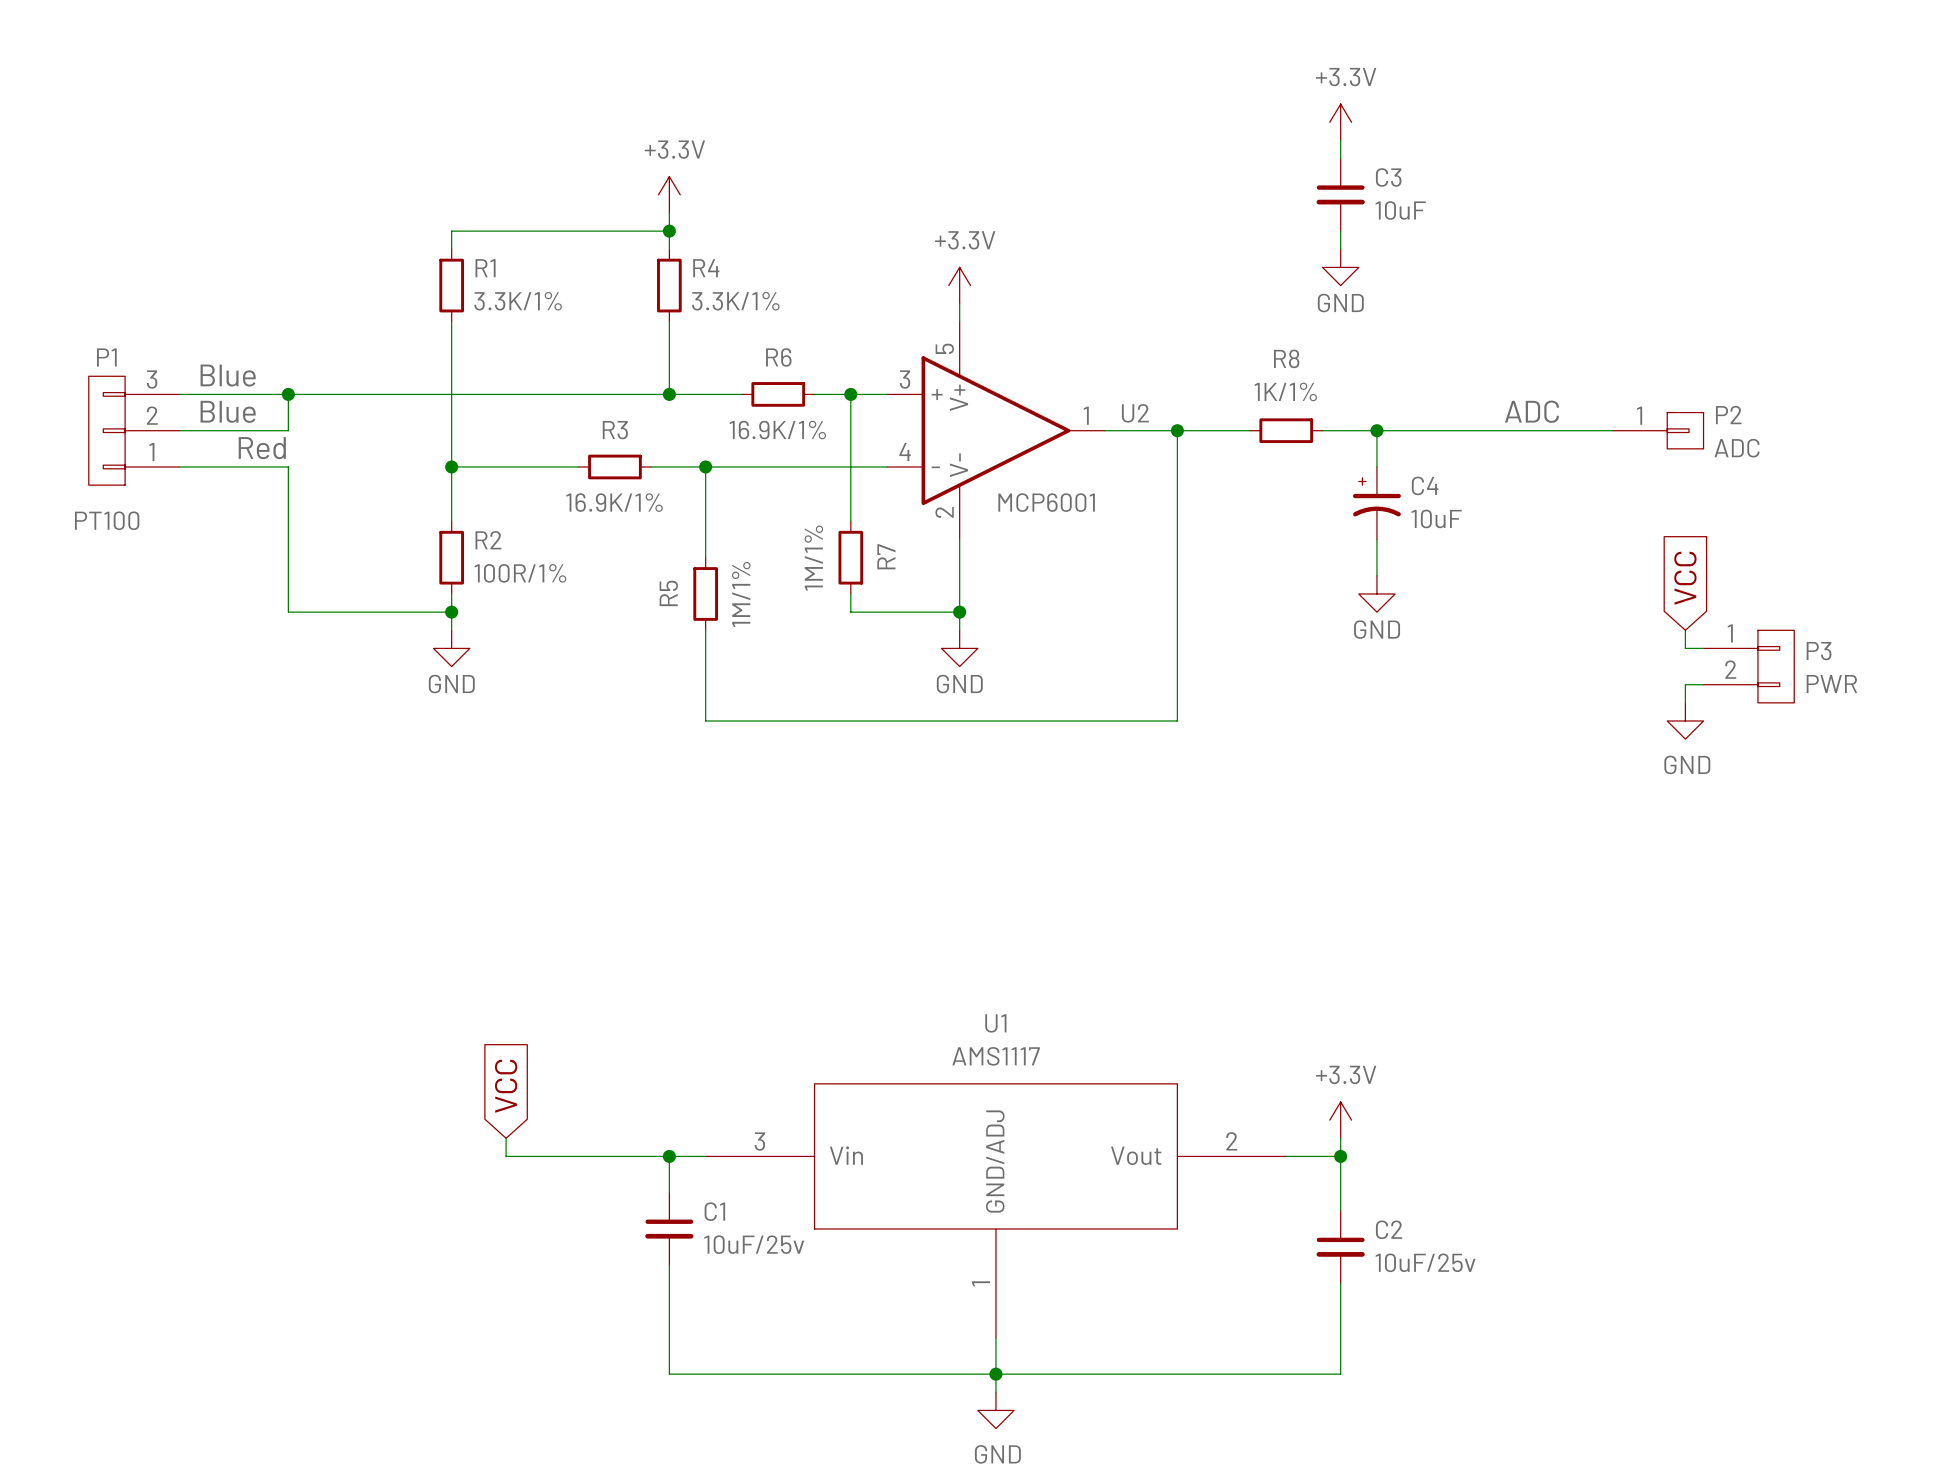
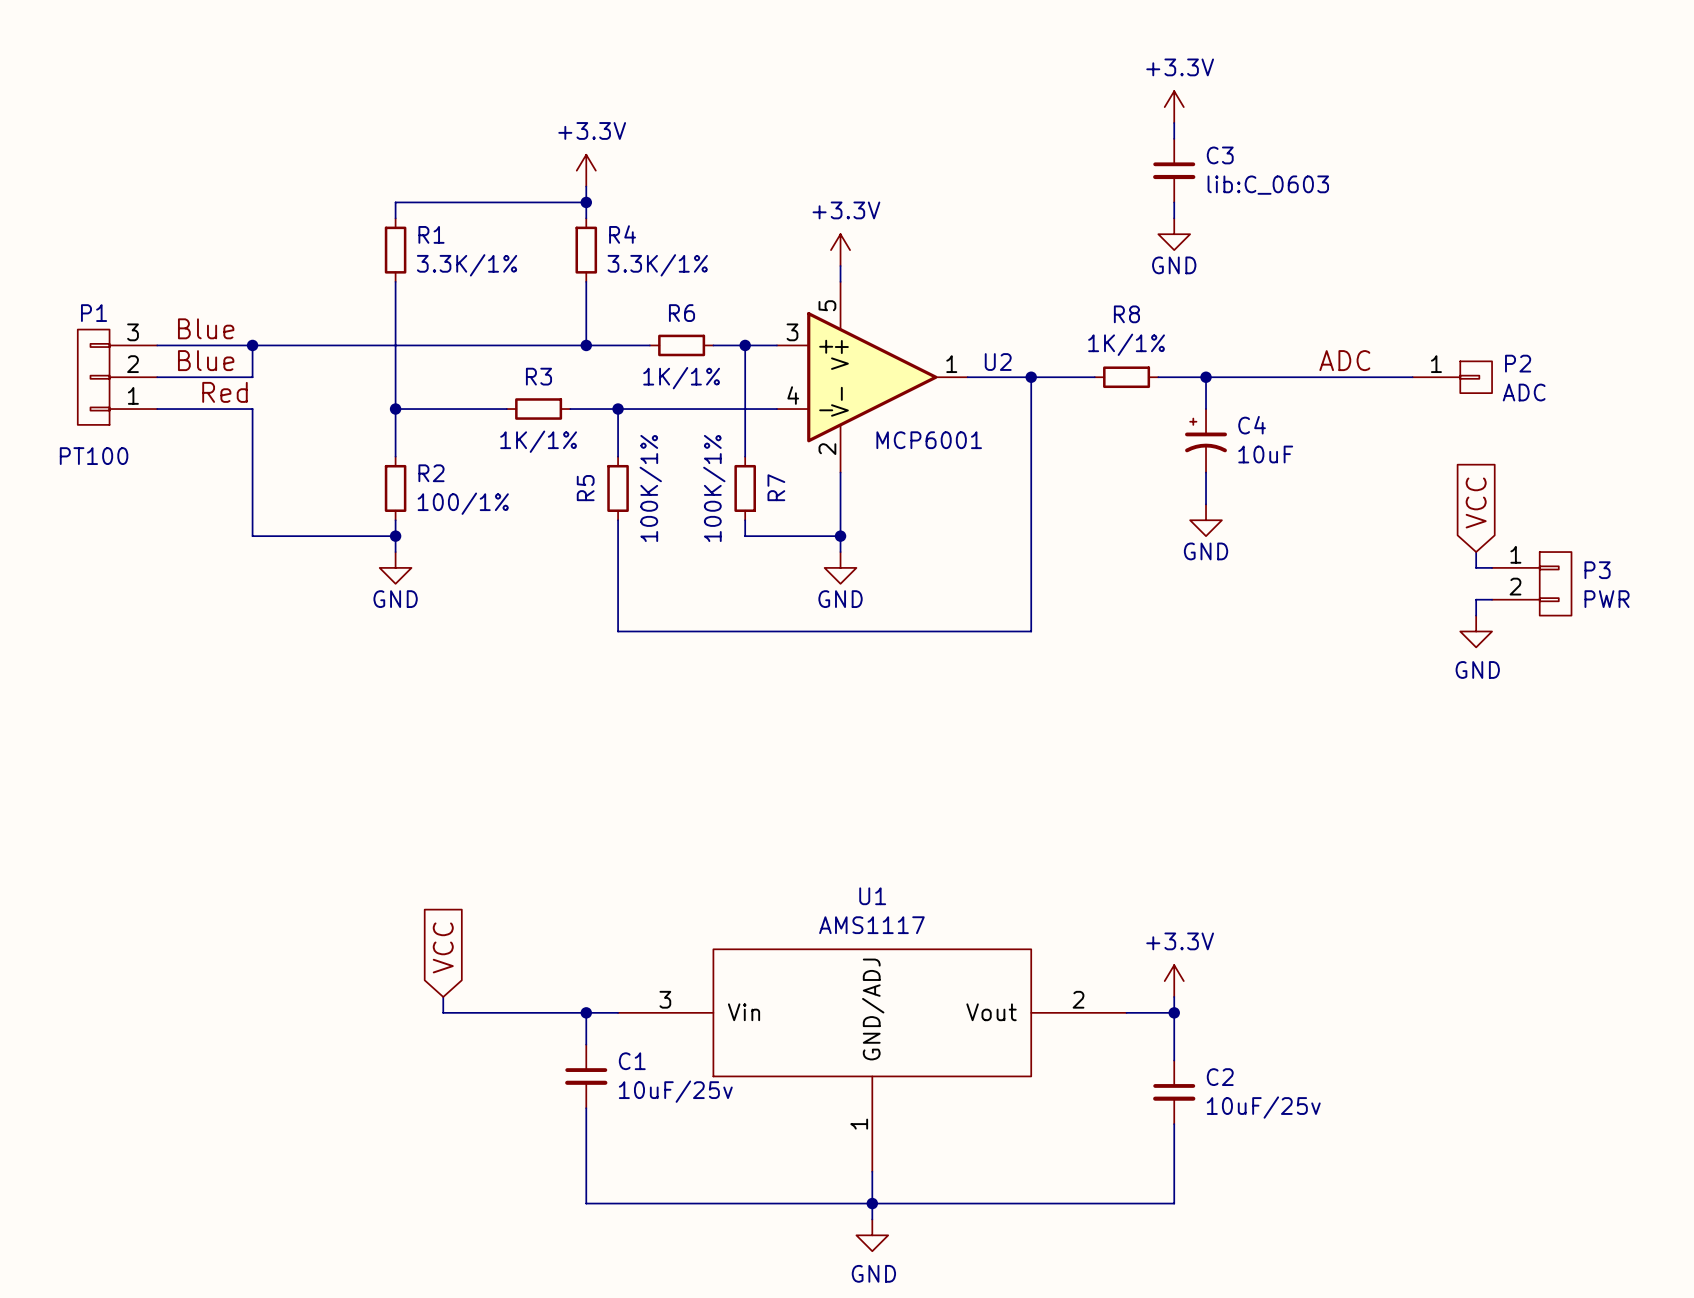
C3 value: 10uF (1400, 210) -> lib:C_0603 (1268, 185)
R6 value: 16.9K/1% (777, 430) -> 1K/1% (681, 378)
R3 value: 16.9K/1% (614, 502) -> 1K/1% (538, 441)
wire: (705, 521) (705, 557) -> (618, 520) (618, 552)
R7 value: 1M/1% (813, 558) -> 100K/1% (714, 488)
R2 value: 100R/1% (520, 573) -> 100/1% (463, 503)
R5 position: (705, 593) -> (618, 488)
R5 value: 1M/1% (741, 594) -> 100K/1% (650, 488)

